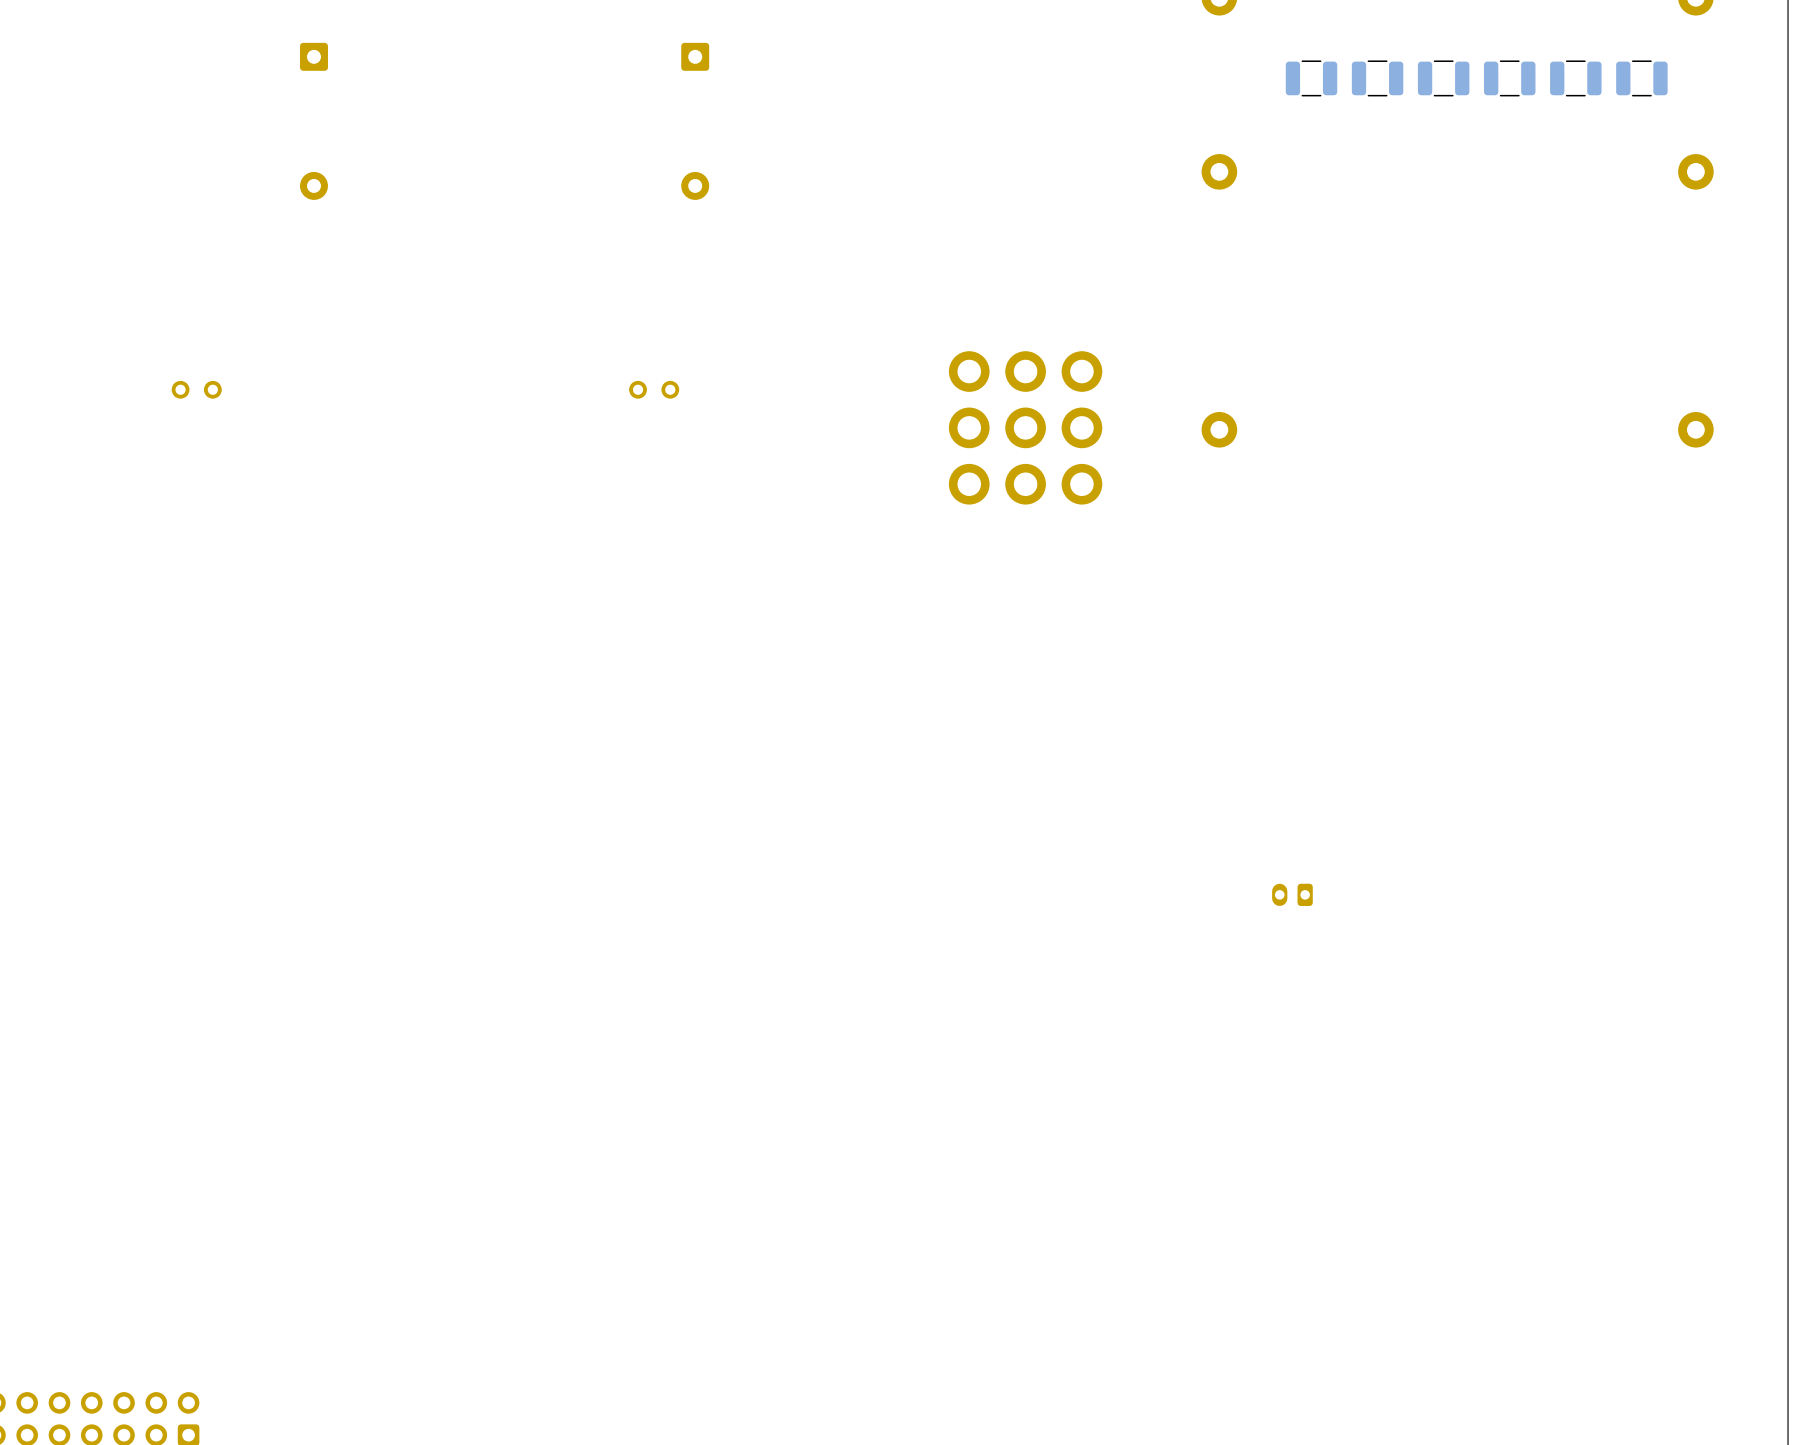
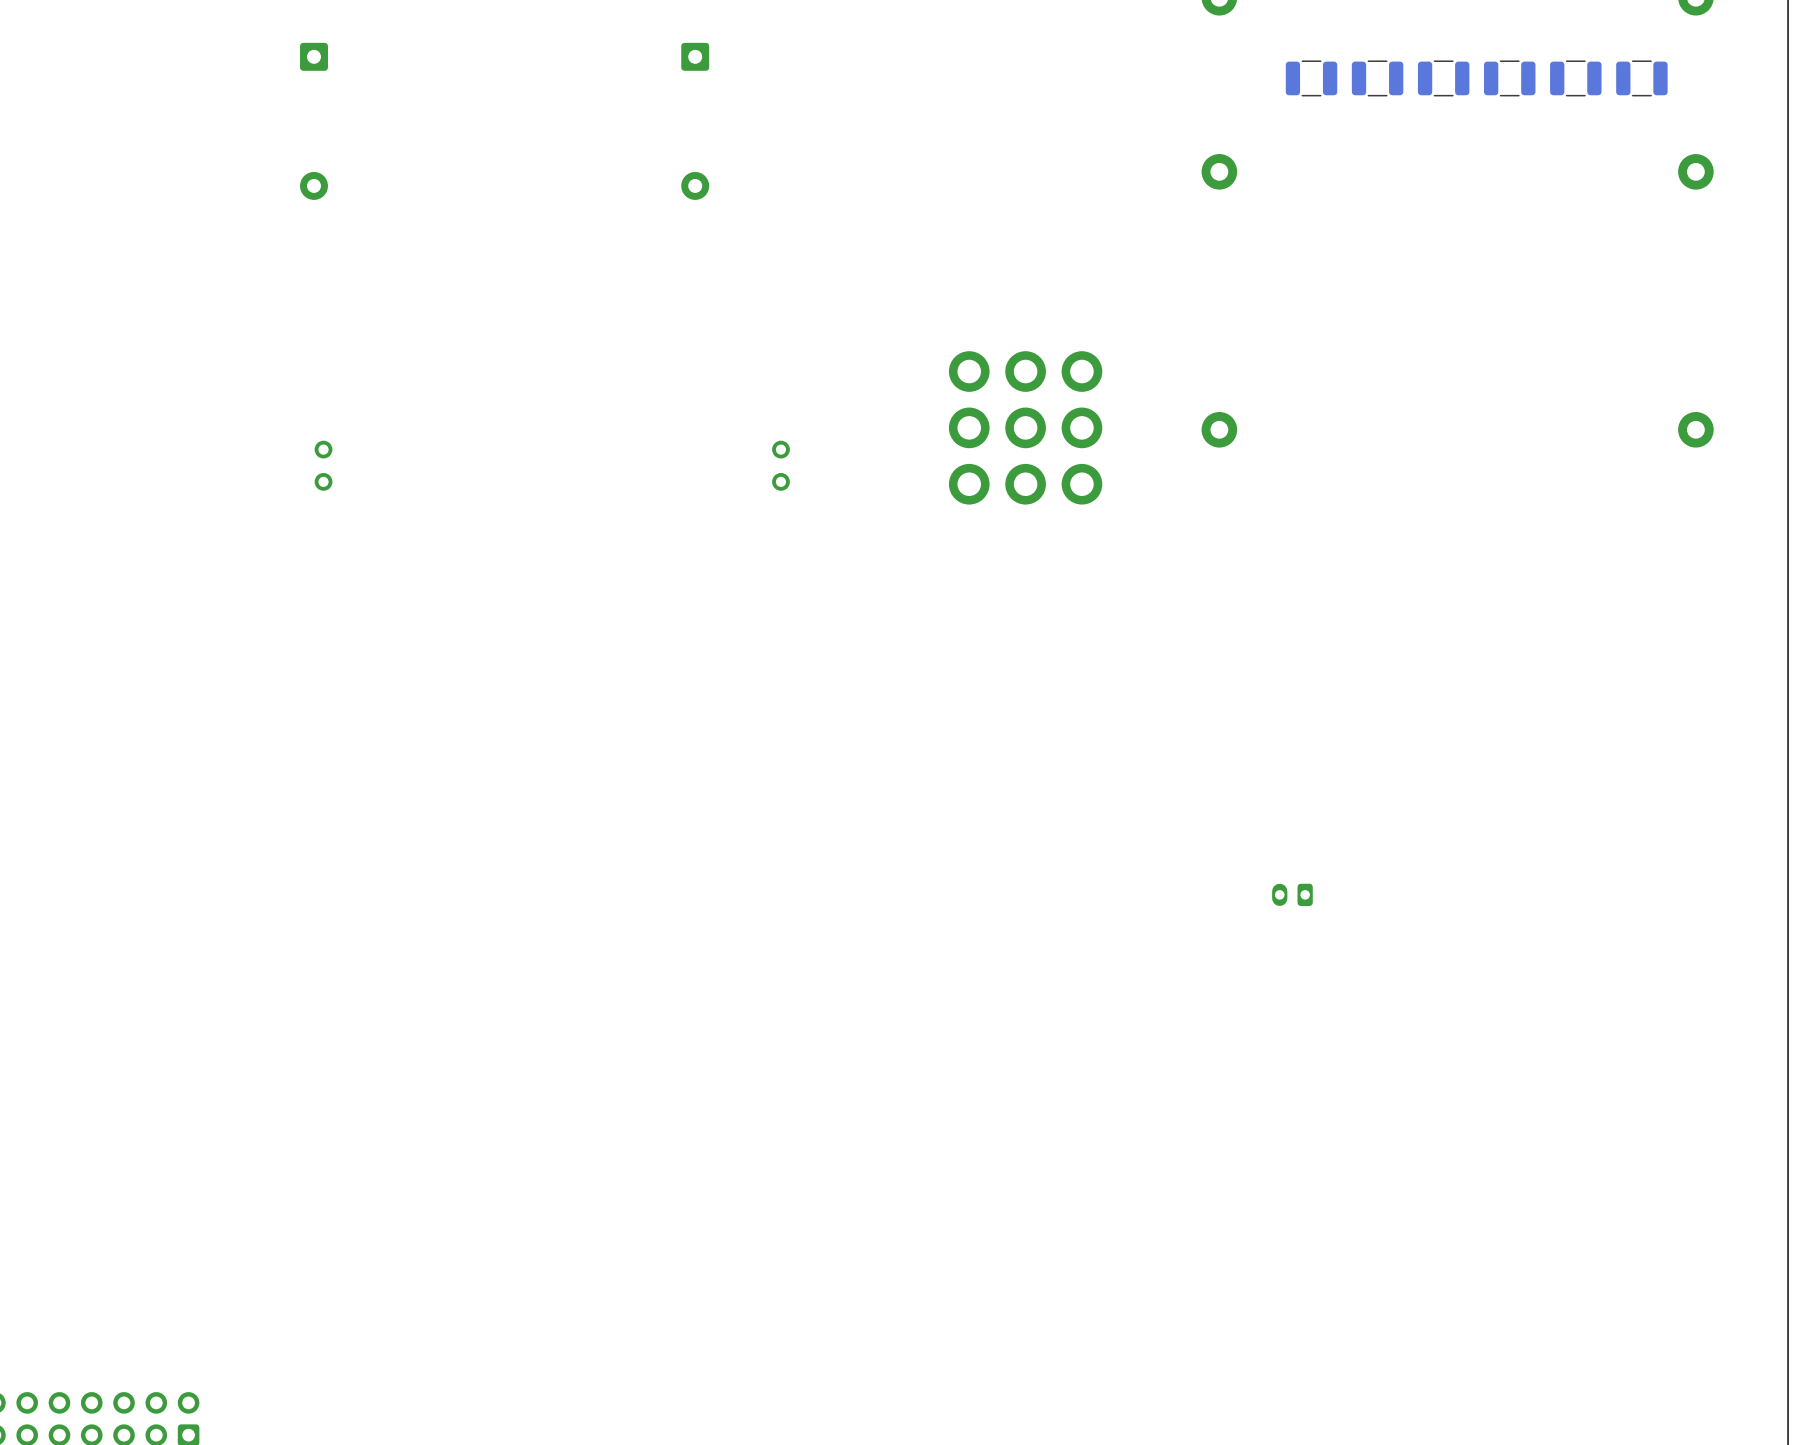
part rotation: 0° (196, 389) -> 90° clockwise (323, 465)
part position: (196, 389) -> (323, 465)
part rotation: 0° (654, 389) -> 90° clockwise (780, 465)
part position: (654, 389) -> (780, 465)

